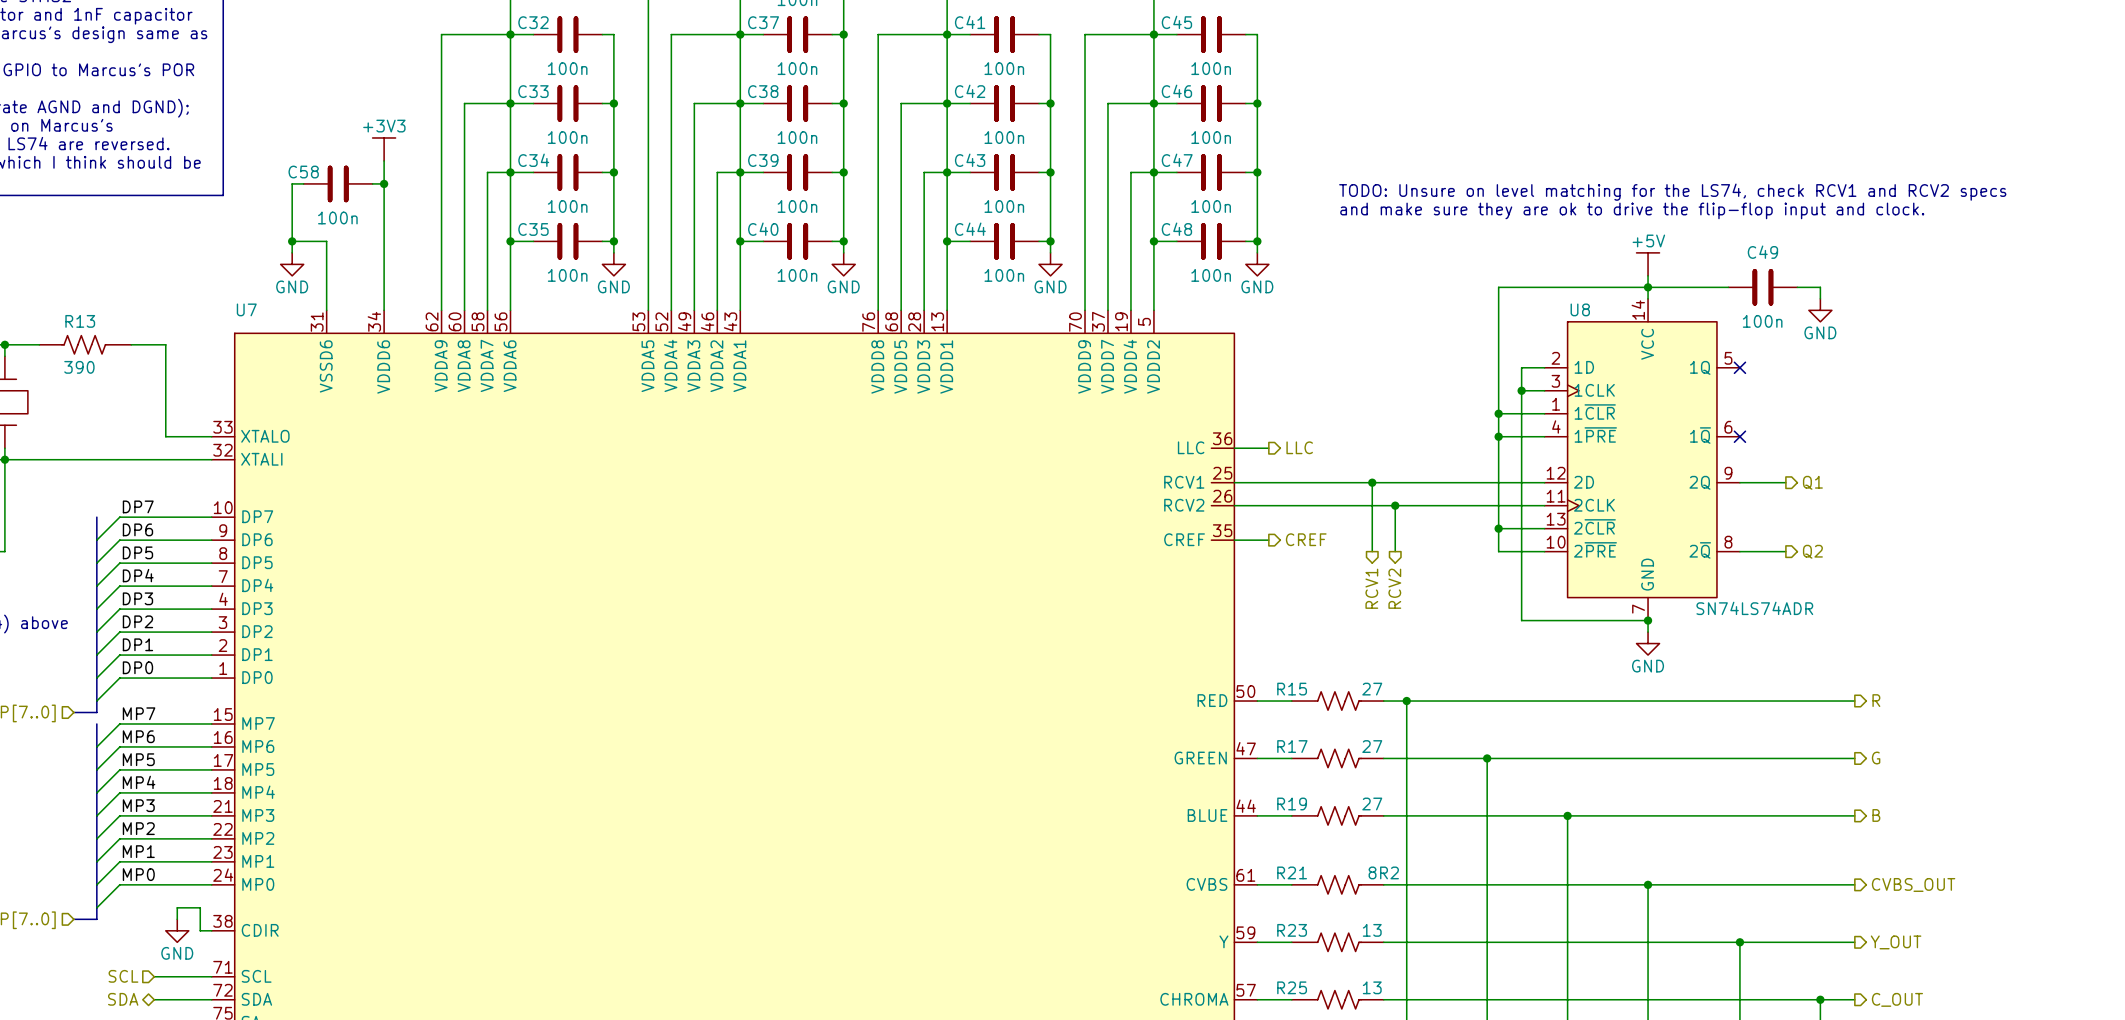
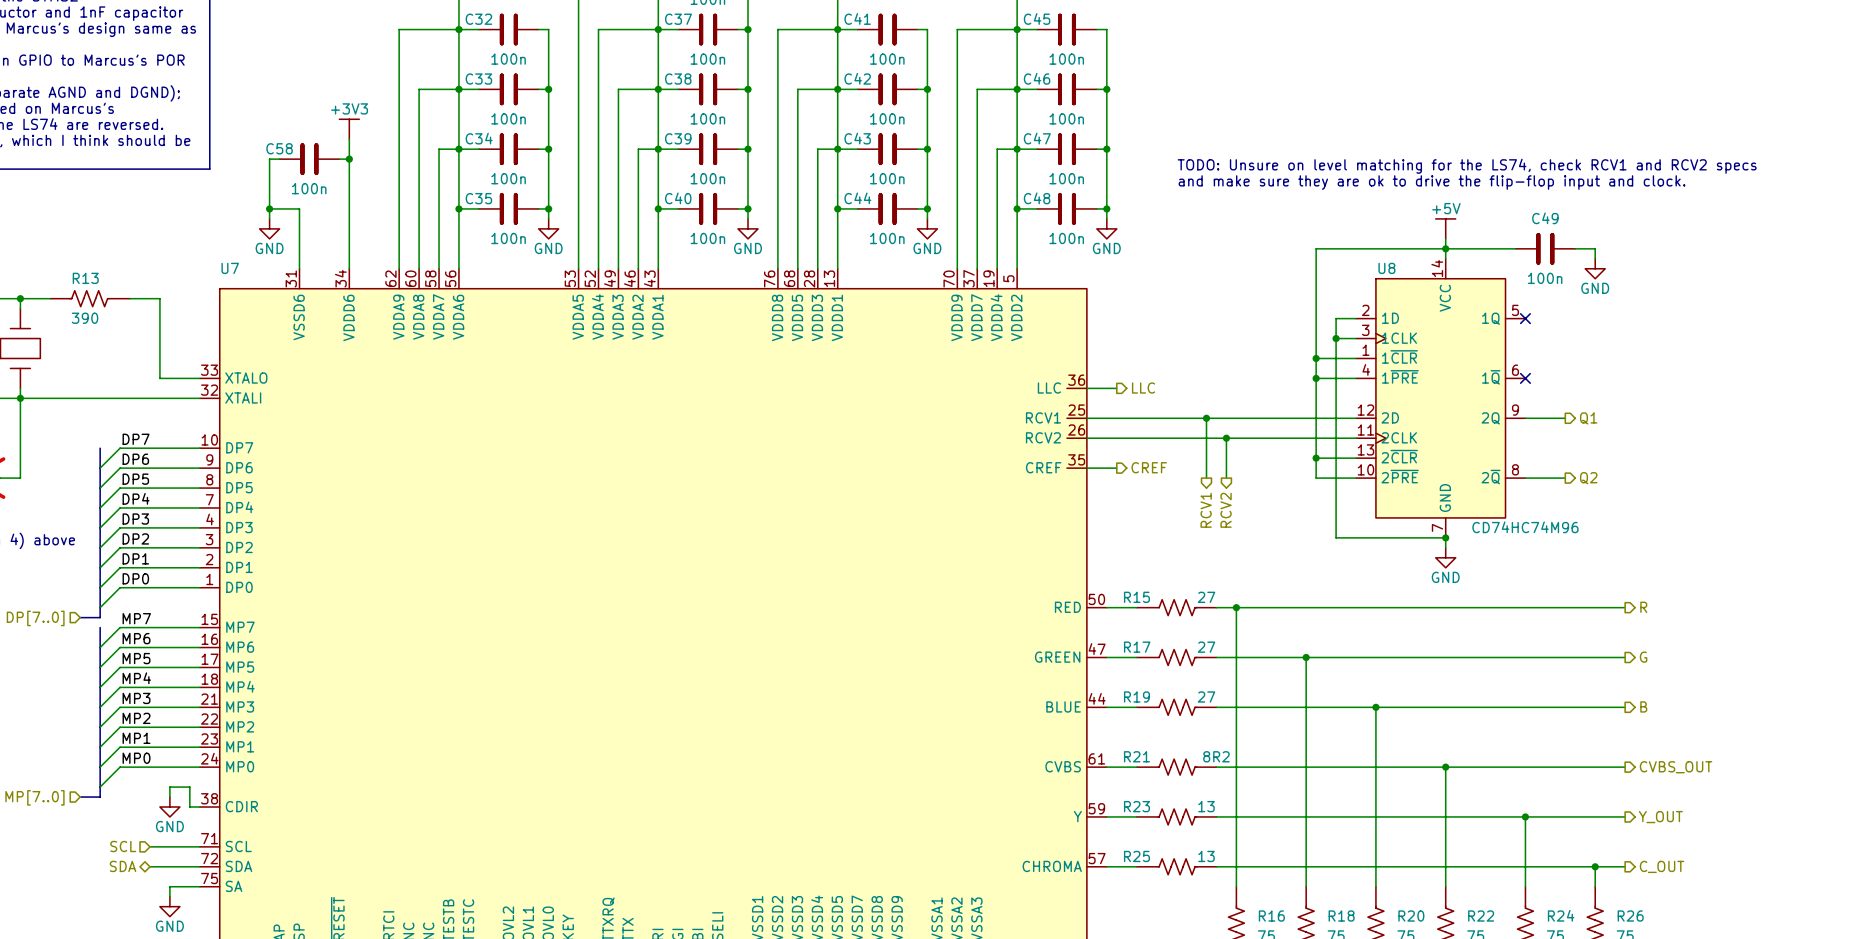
U8 value: SN74LS74ADR (1754, 608) -> CD74HC74M96 (1525, 527)

